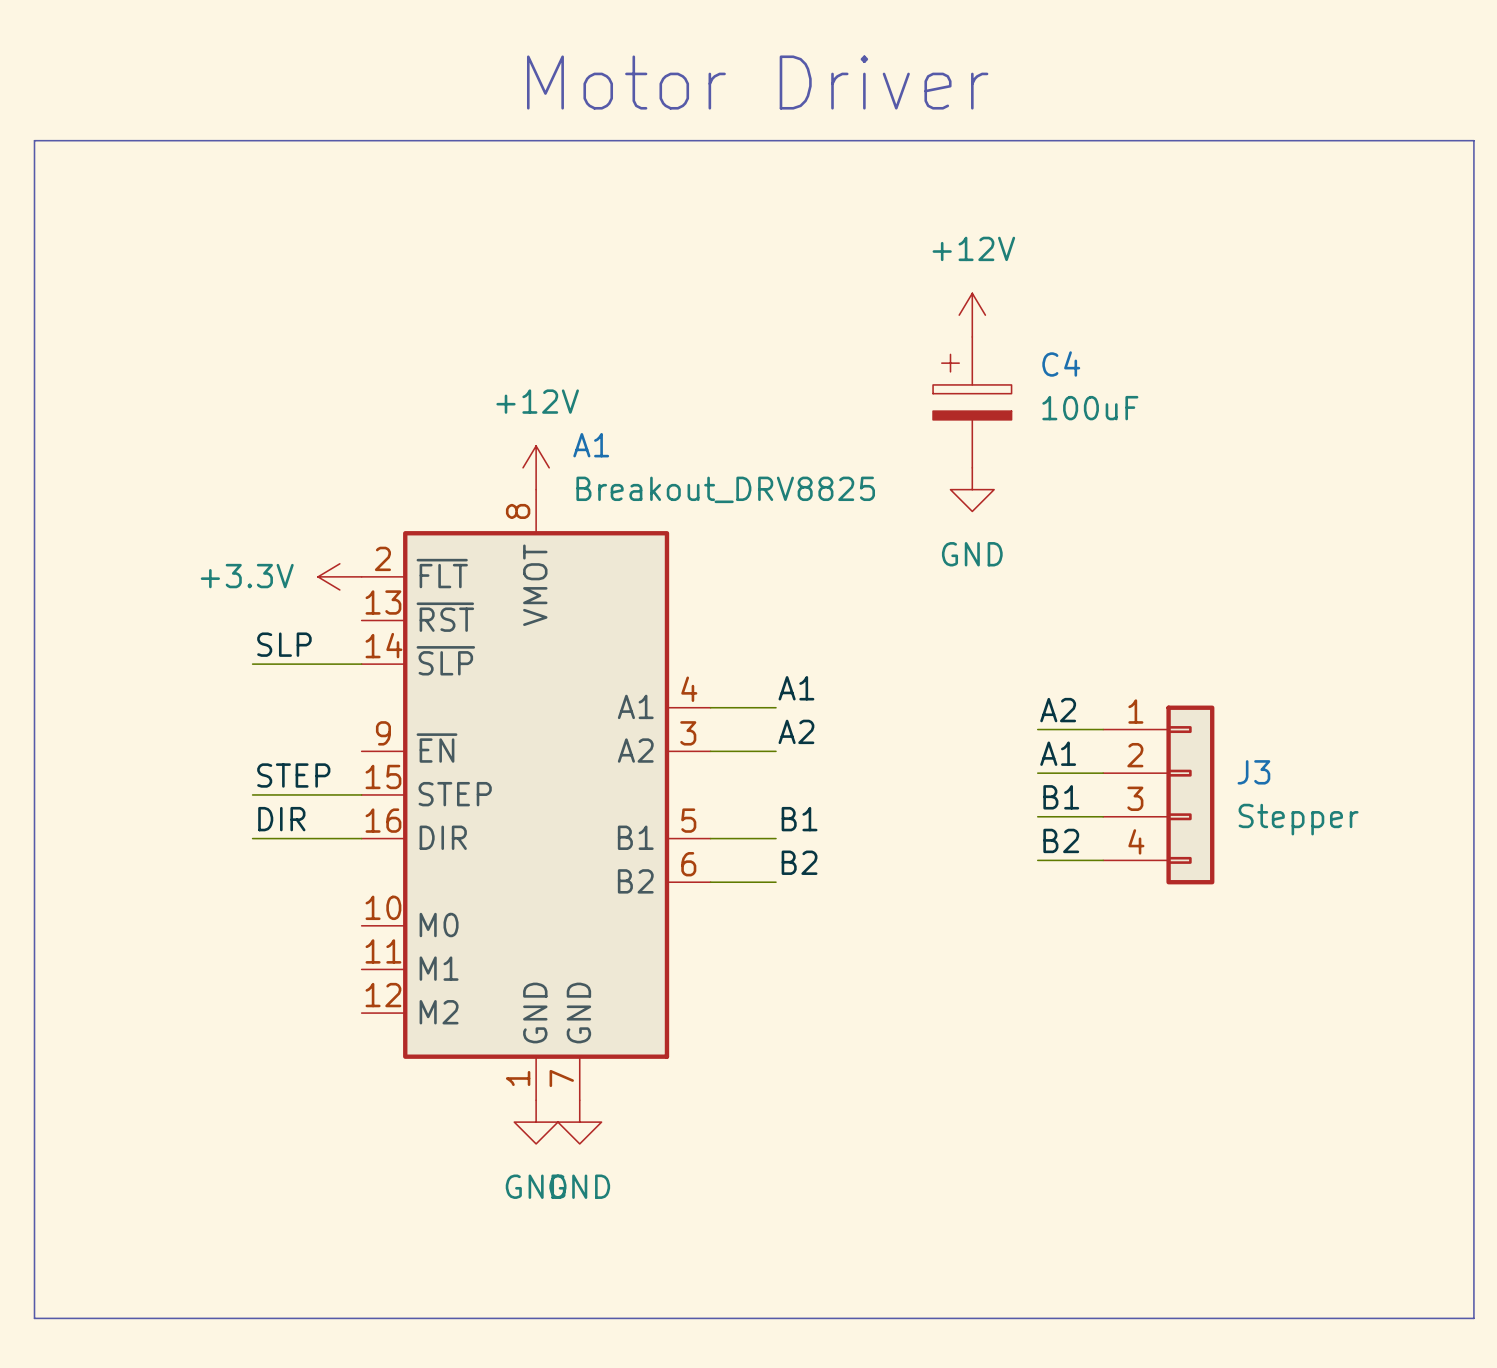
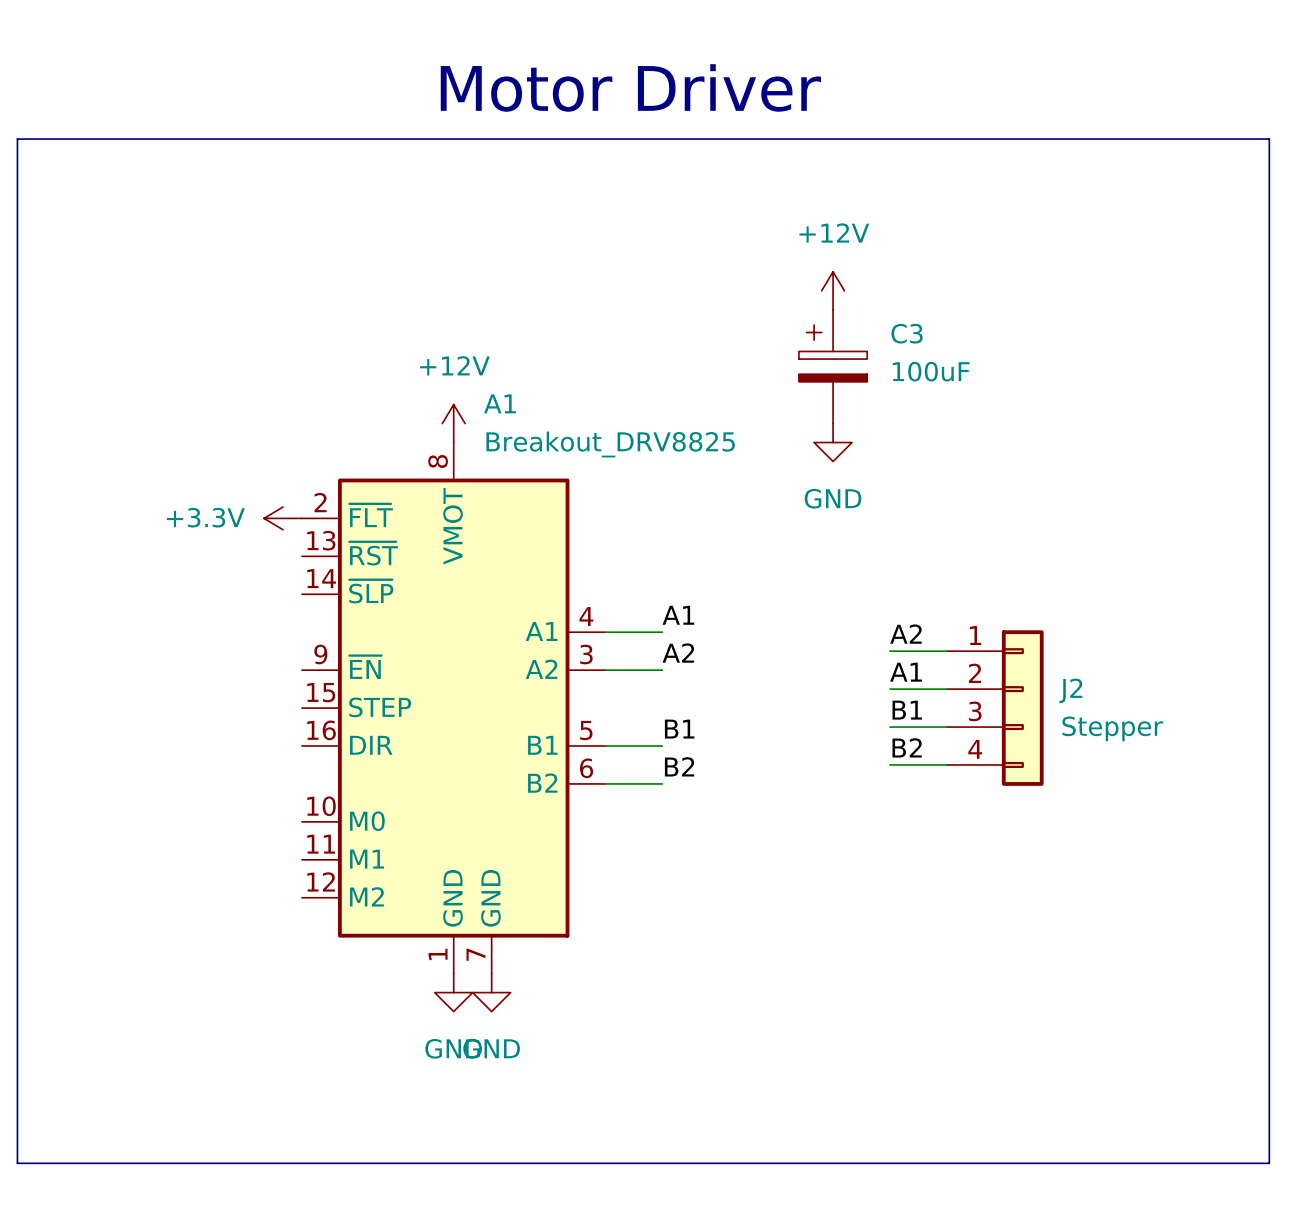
C4 name: C4 (1061, 363) -> C3 (907, 333)
label: SLP (284, 644) -> none
wire: (252, 664) (361, 664) -> none
J3 name: J3 (1253, 772) -> J2 (1070, 690)
label: STEP (293, 775) -> none
wire: (252, 794) (361, 794) -> none
label: DIR (281, 819) -> none
wire: (252, 838) (361, 838) -> none

